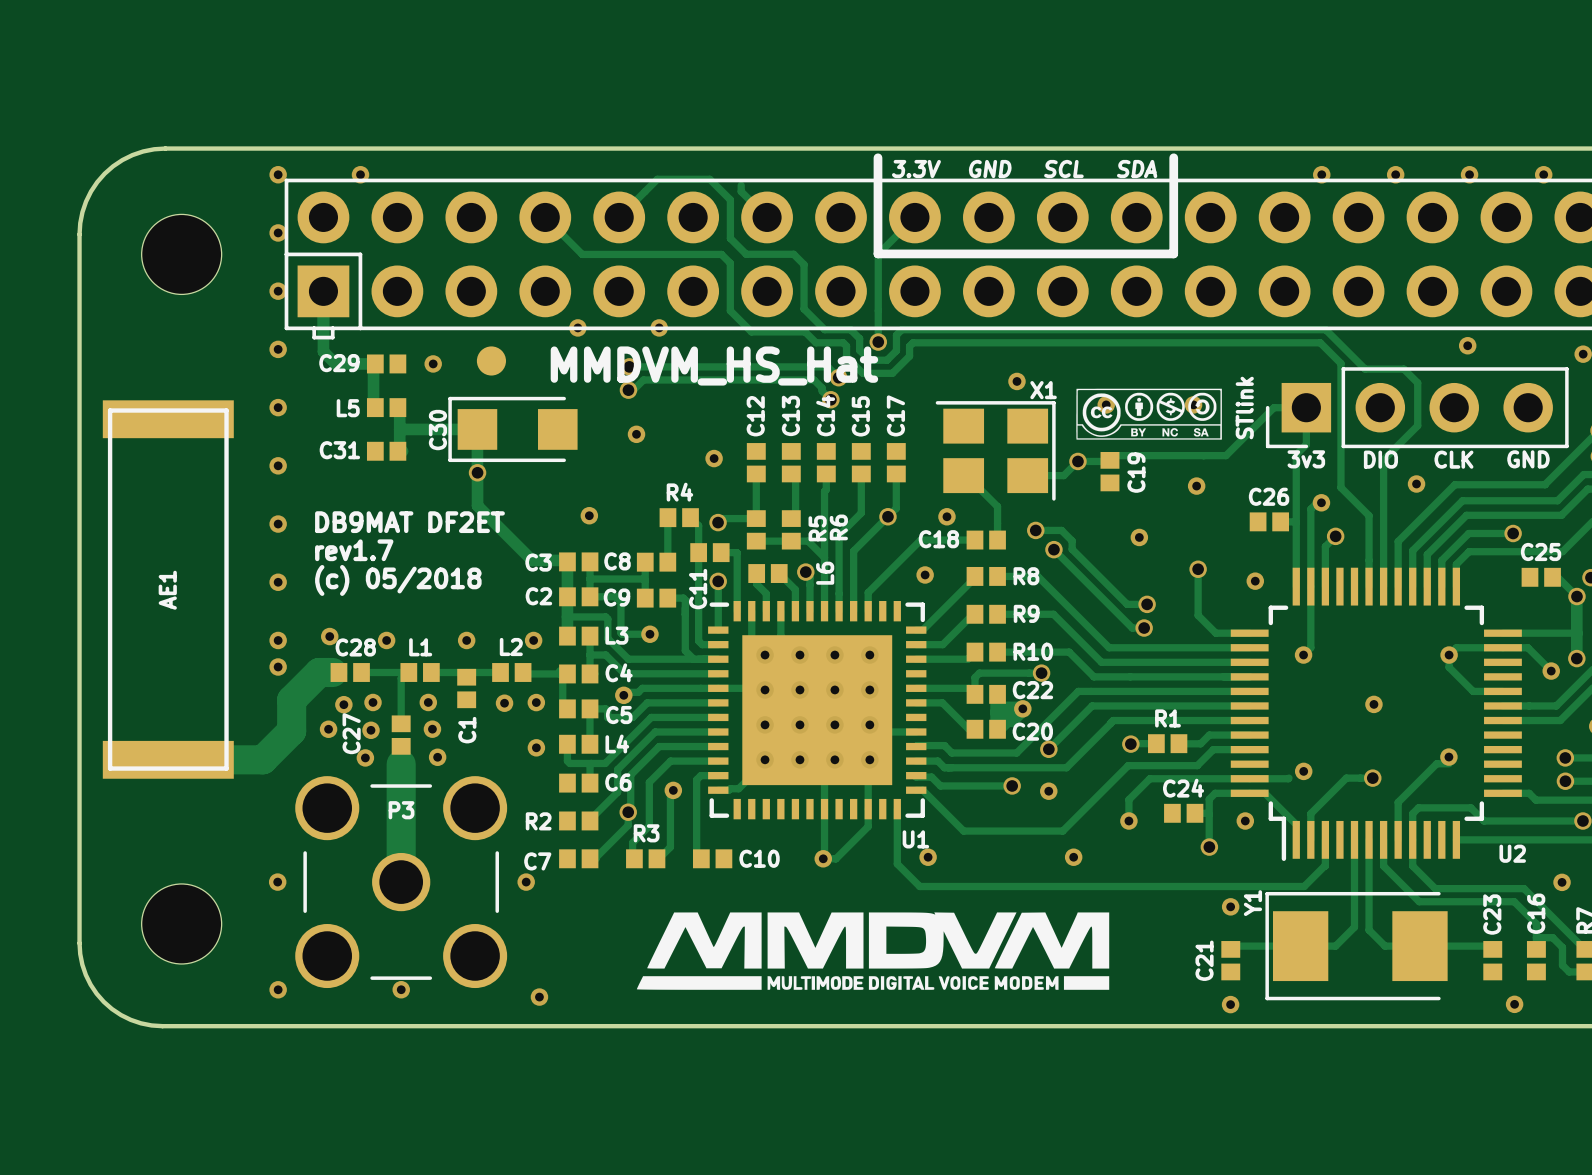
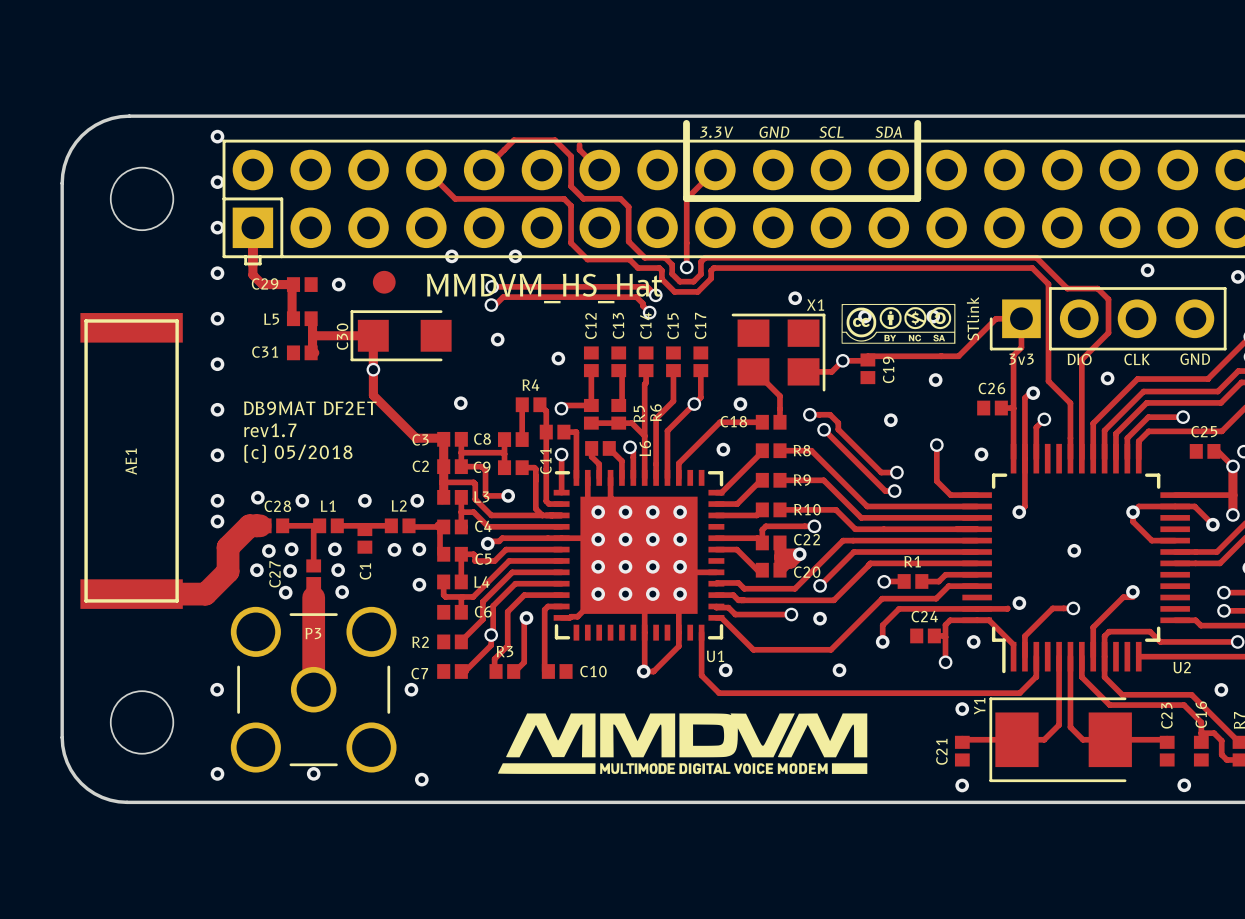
via: (360, 174) -> none
via: (1321, 174) -> none
via: (1395, 174) -> none
via: (1469, 174) -> none
via: (1543, 174) -> none

